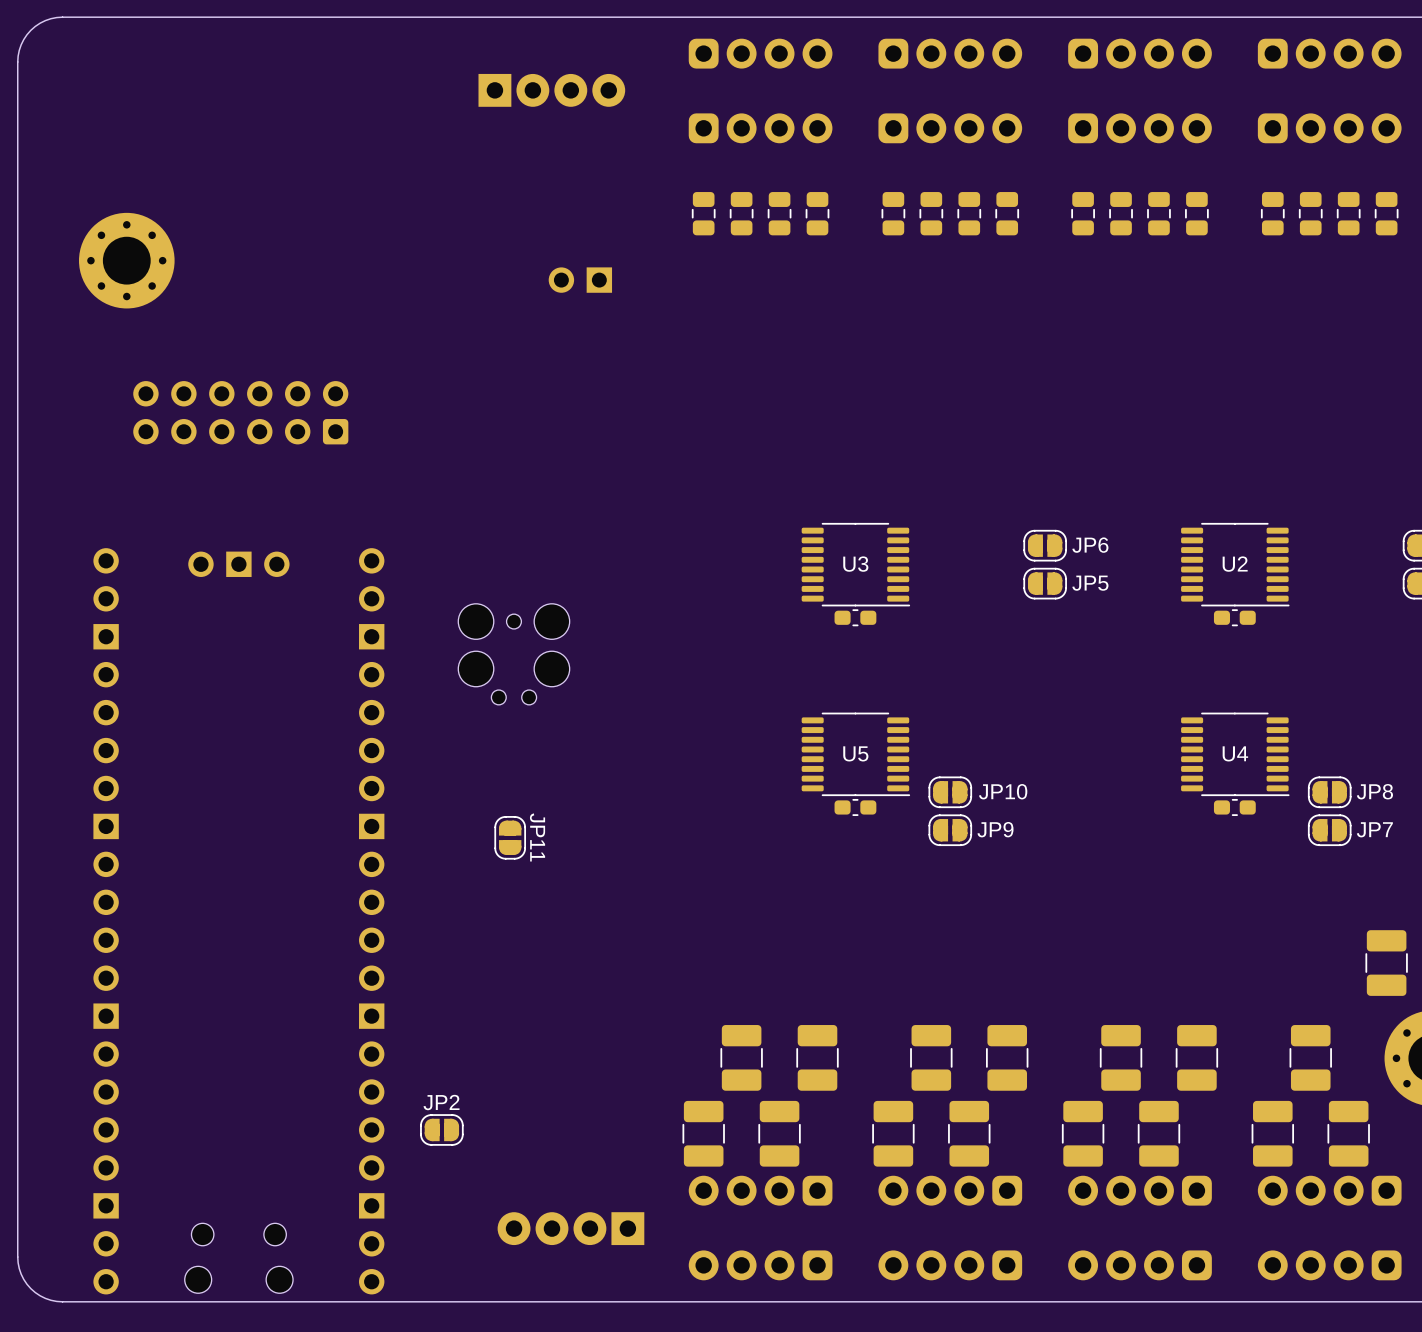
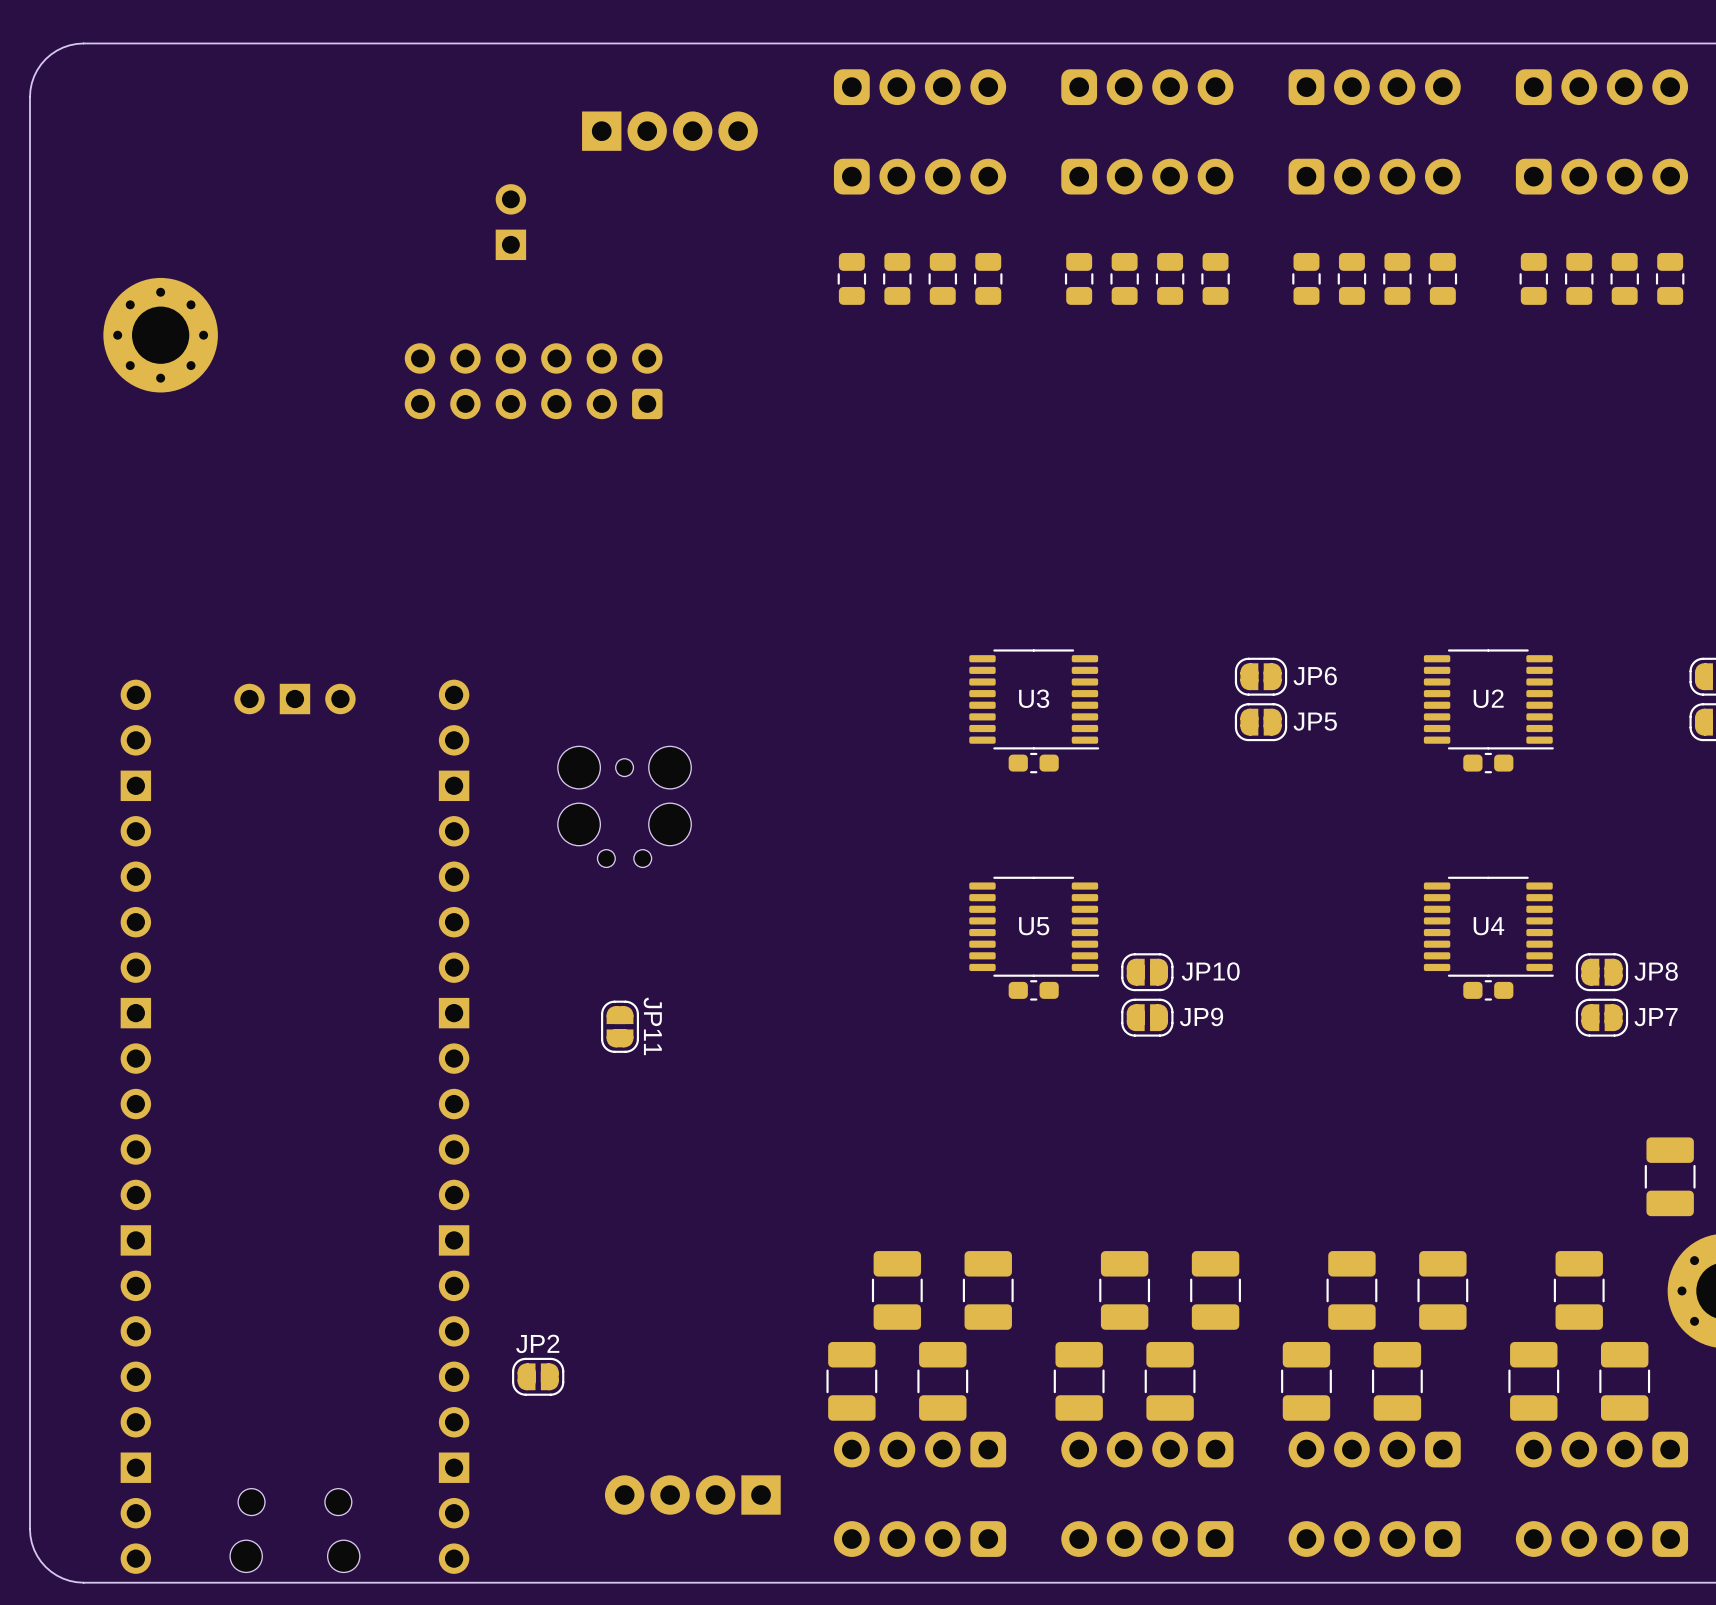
part rotation: 0° (580, 280) -> 90° clockwise (510, 222)
part position: (580, 280) -> (510, 222)
part position: (240, 412) -> (533, 381)

